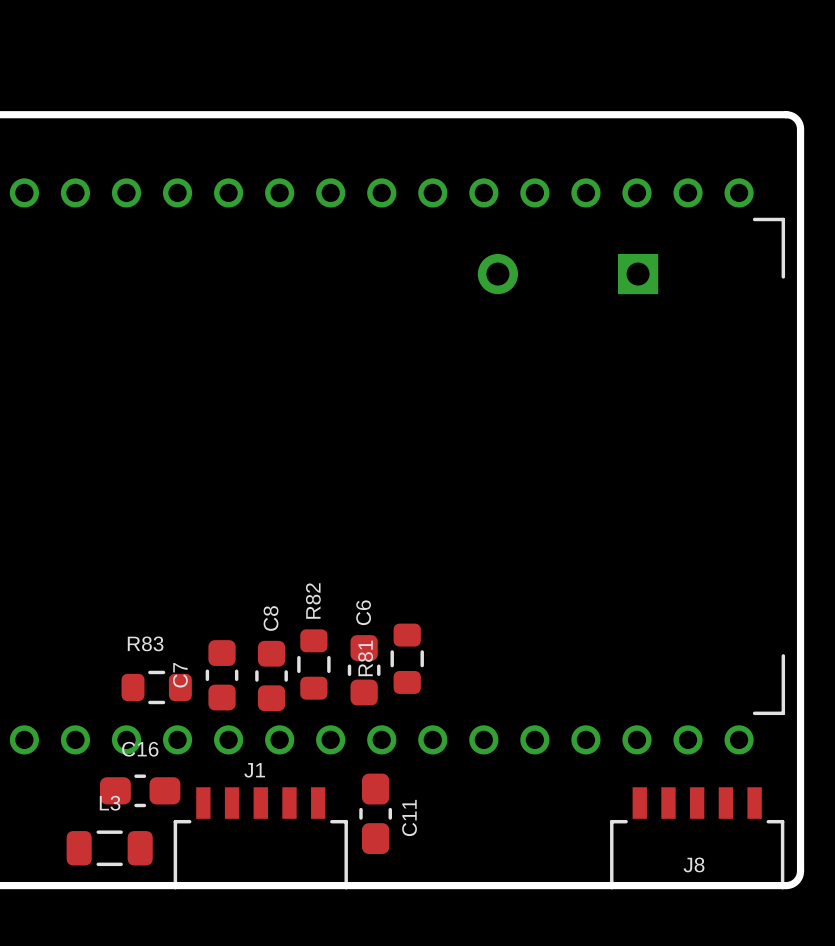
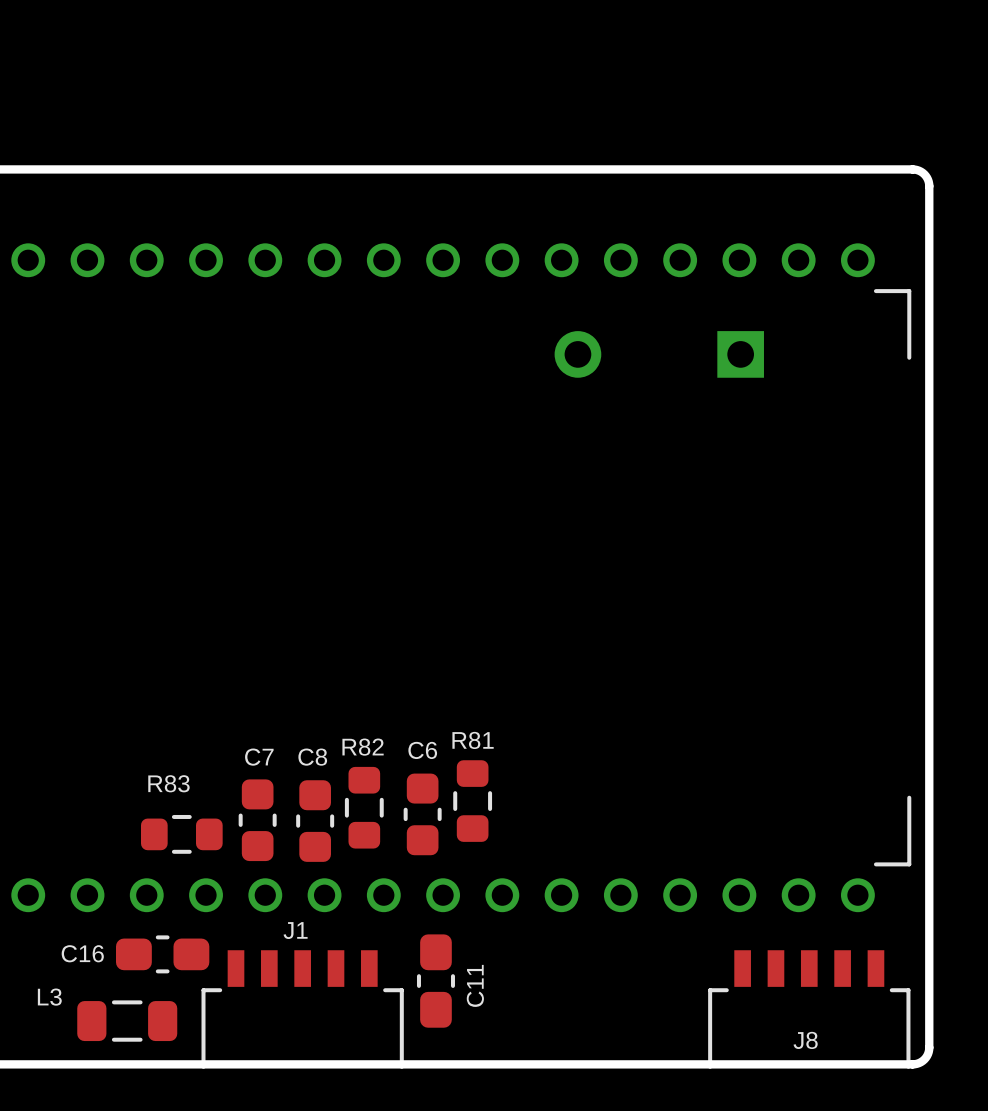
R82 name rotation: 0° (313, 601) -> 90° clockwise (363, 747)
C6 name rotation: 0° (363, 612) -> 90° clockwise (422, 750)
C8 name rotation: 0° (271, 618) -> 90° clockwise (312, 757)
R81 name rotation: 0° (365, 658) -> 90° clockwise (473, 740)
R81 name position: R81 (365, 658) -> R81 (473, 740)
C7 name rotation: 0° (180, 675) -> 90° clockwise (259, 757)
C7 name position: C7 (180, 675) -> C7 (259, 757)
C16 name position: C16 (140, 749) -> C16 (82, 953)
L3 name position: L3 (110, 803) -> L3 (49, 997)

